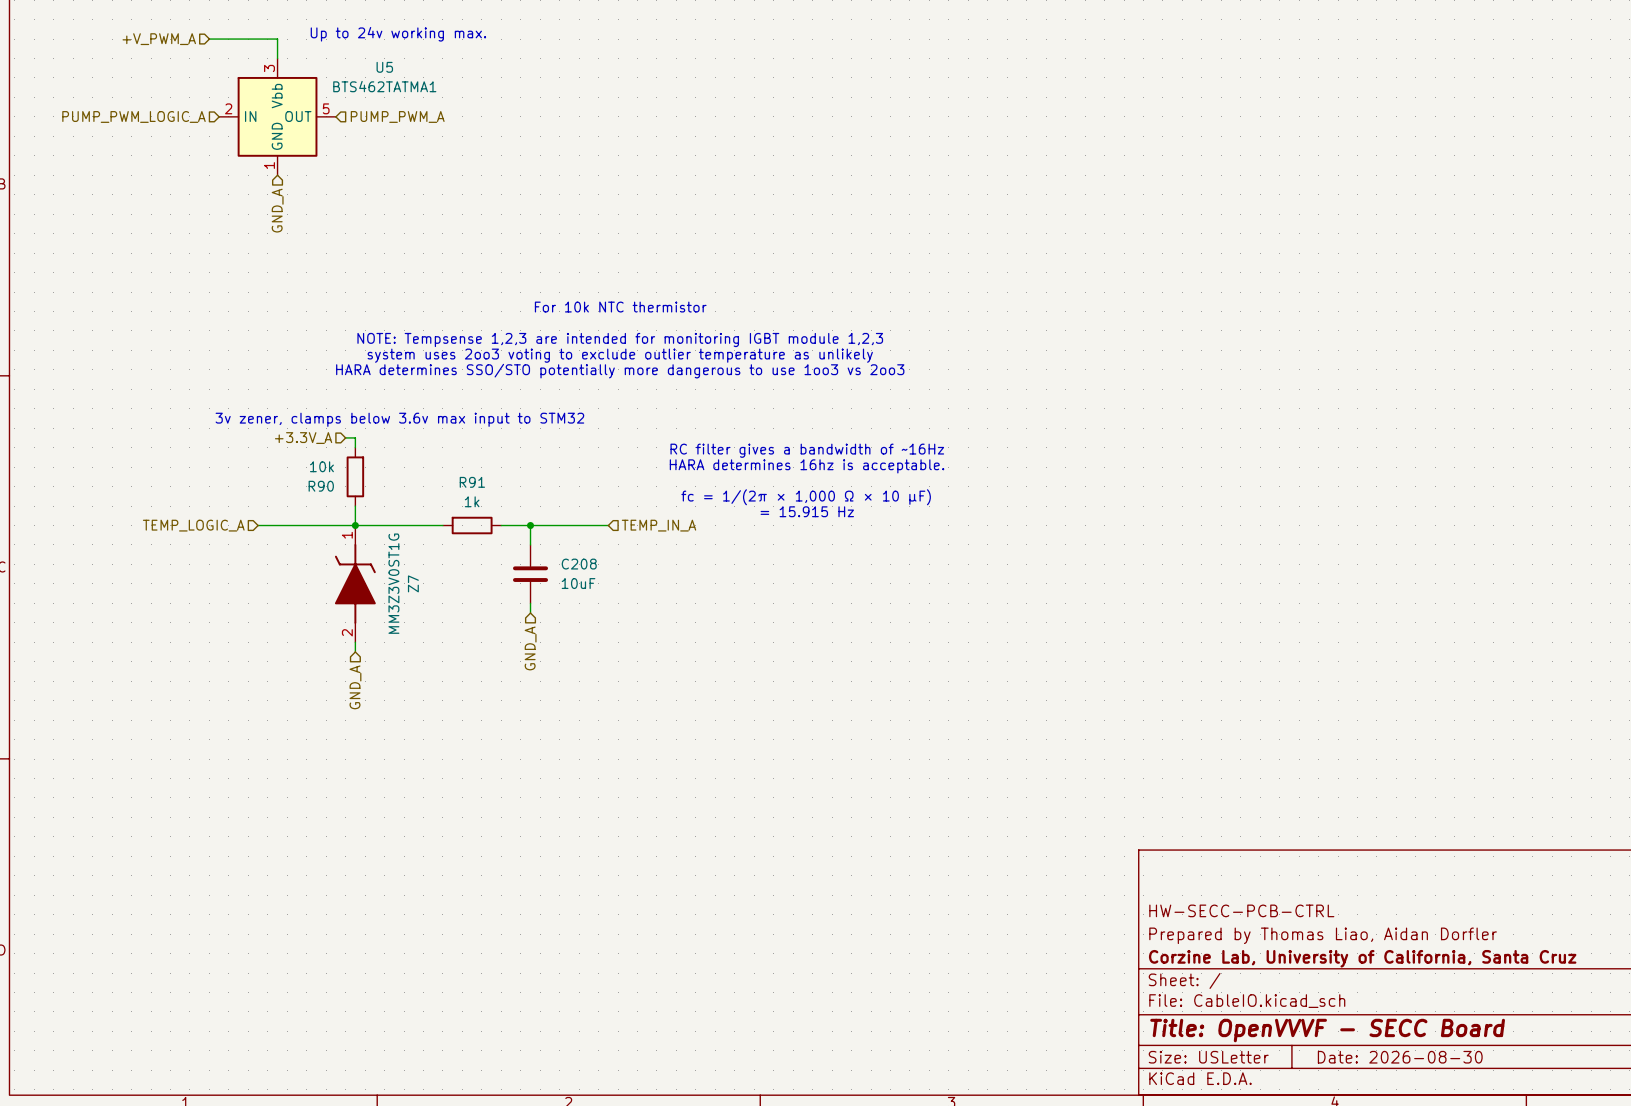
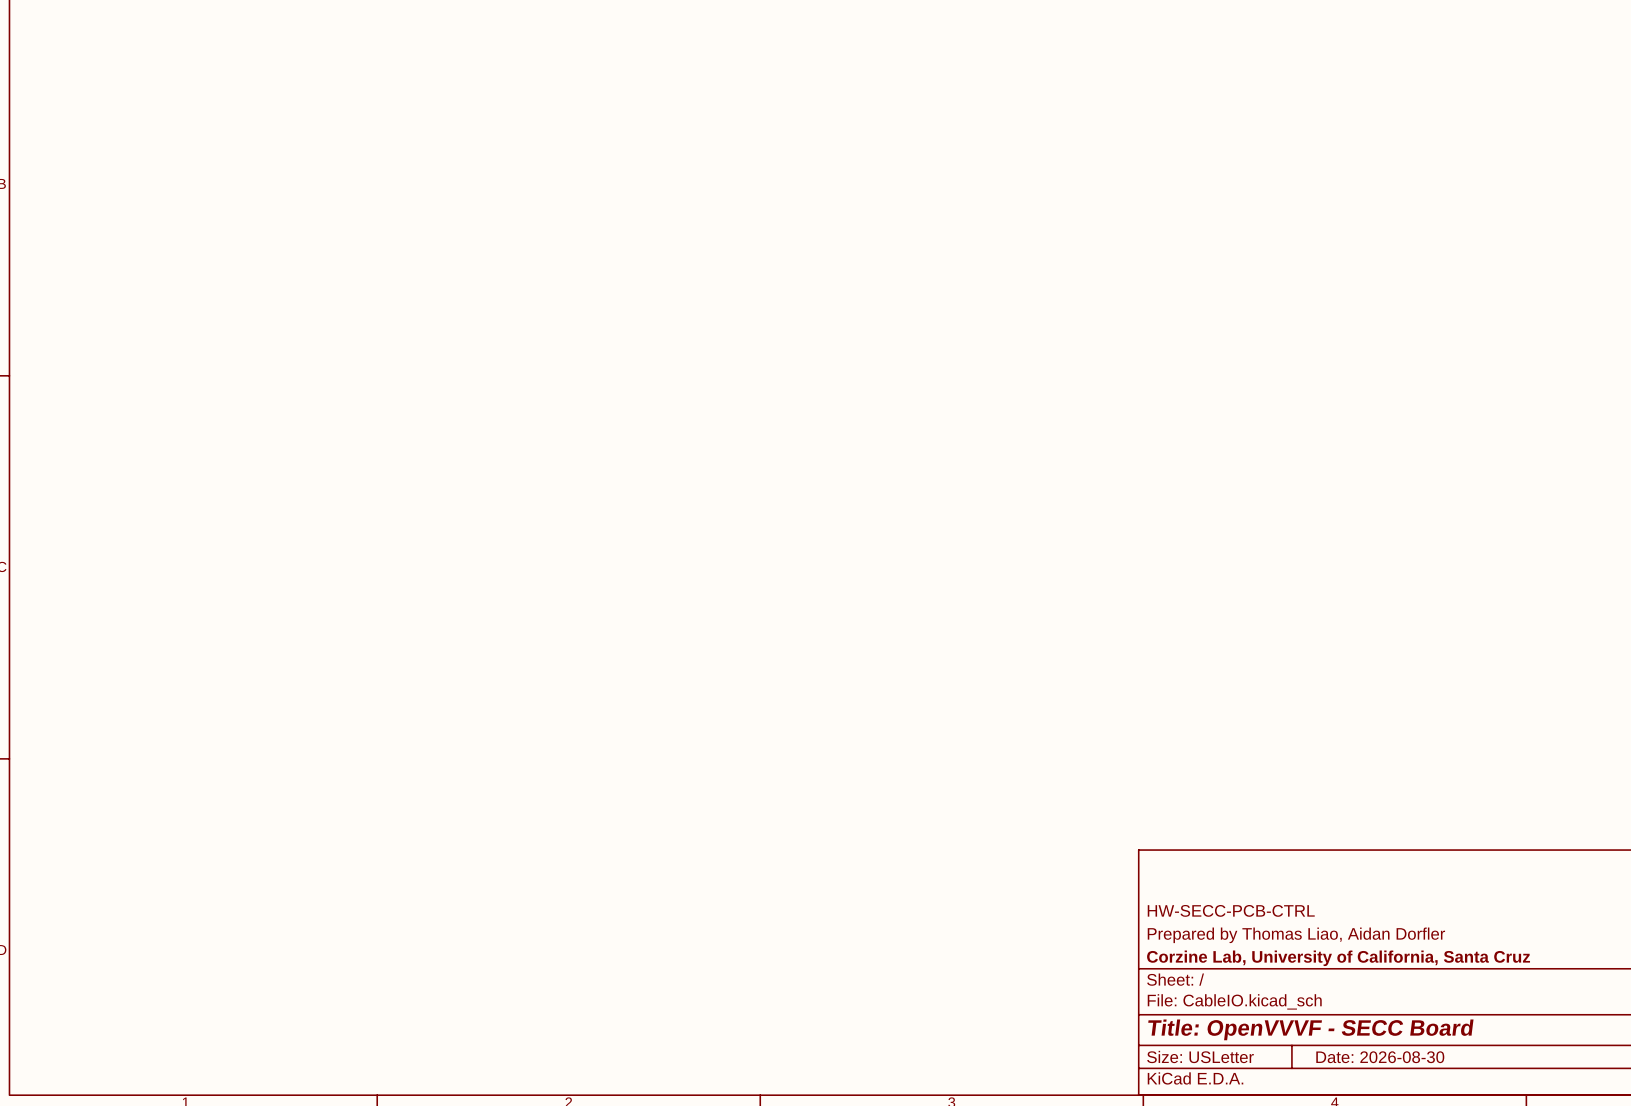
text: Up to 24v working max. (398, 34) -> none
hierarchical label: +V_PWM_A (159, 39) -> none
wire: (209, 39) (277, 39) (277, 58) -> none
hierarchical label: PUMP_PWM_LOGIC_A (133, 116) -> none
U5: BTS462TATMA1 (277, 116) -> none
hierarchical label: PUMP_PWM_A (397, 116) -> none
hierarchical label: GND_A (277, 210) -> none
text: For 10k NTC thermistor (620, 307) -> none
text: NOTE: Tempsense 1,2,3 are intended for monitoring IGBT module 1,2,3 (620, 340) -> none
text: system uses 2oo3 voting to exclude outlier temperature as unlikely (620, 355) -> none
text: HARA determines SSO/STO potentially more dangerous to use 1oo3 vs 2oo3 (620, 371) -> none
text: 3v zener, clamps below 3.6v max input to STM32 (399, 419) -> none
wire: (345, 437) (355, 437) (355, 447) -> none
hierarchical label: +3.3V_A (303, 438) -> none
text: RC filter gives a bandwidth of ~16Hz (807, 450) -> none
text: HARA determines 16hz is acceptable. (807, 466) -> none
R90: 10k (355, 476) -> none
text: fc = 1/(2π × 1,000 Ω × 10 μF) (806, 497) -> none
wire: (355, 506) (355, 525) -> none
text: = 15.915 Hz (807, 511) -> none
hierarchical label: TEMP_LOGIC_A (193, 525) -> none
wire: (258, 525) (442, 525) -> none
junction: (355, 525) -> none
R91: 1k (472, 525) -> none
wire: (501, 525) (608, 525) -> none
wire: (530, 525) (530, 544) -> none
junction: (530, 525) -> none
hierarchical label: TEMP_IN_A (659, 525) -> none
C208: 10uF (530, 574) -> none
Z7: MM3Z3V0ST1G (355, 583) -> none
wire: (530, 603) (530, 613) -> none
wire: (355, 642) (355, 652) -> none
hierarchical label: GND_A (530, 648) -> none
hierarchical label: GND_A (355, 687) -> none

